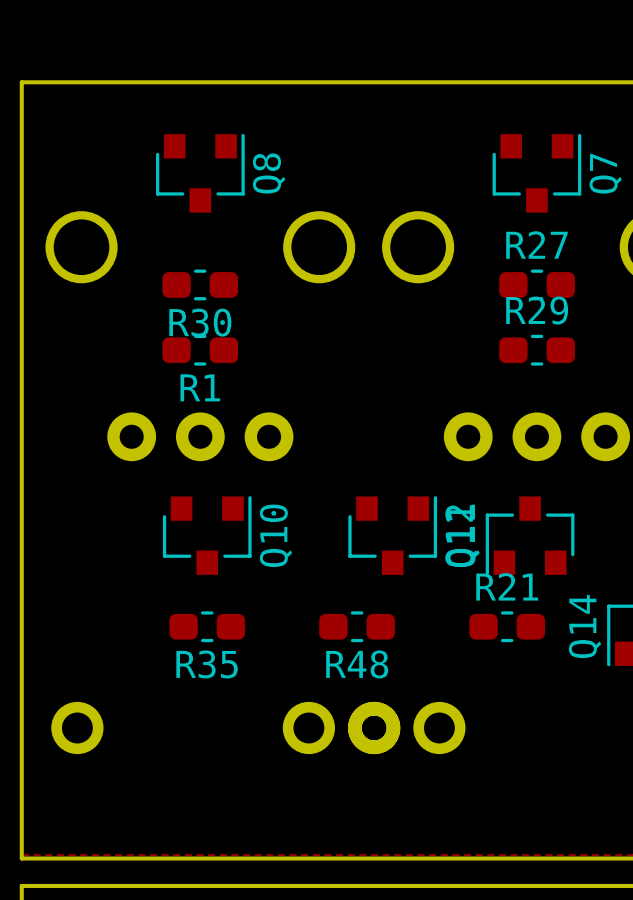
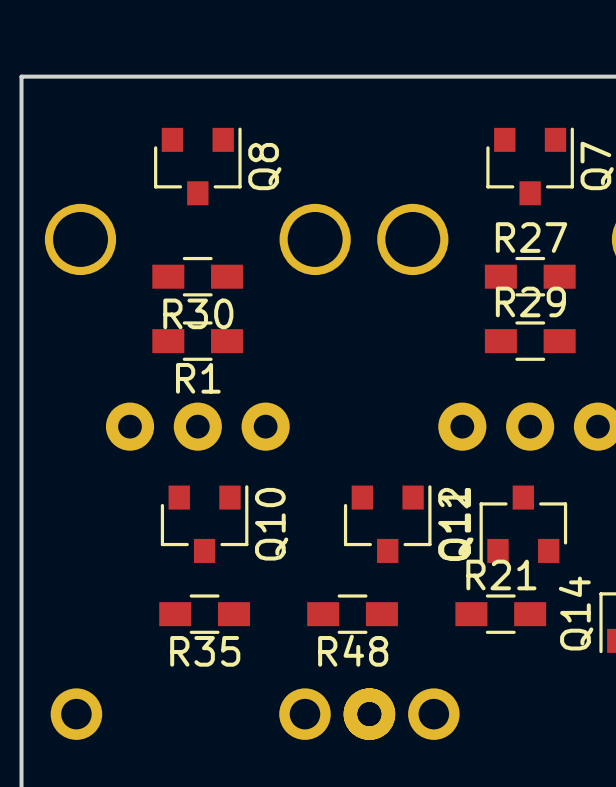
R30 footprint: [162, 269, 239, 301] -> [152, 256, 244, 297]
R27 footprint: [499, 269, 575, 301] -> [484, 256, 576, 297]
R1 footprint: [162, 334, 239, 366] -> [152, 321, 244, 361]
R29 footprint: [499, 334, 575, 366] -> [484, 321, 576, 361]
R35 footprint: [169, 611, 246, 643] -> [159, 594, 251, 634]
R48 footprint: [319, 611, 395, 643] -> [307, 594, 398, 634]
R21 footprint: [469, 611, 546, 643] -> [455, 594, 547, 634]

